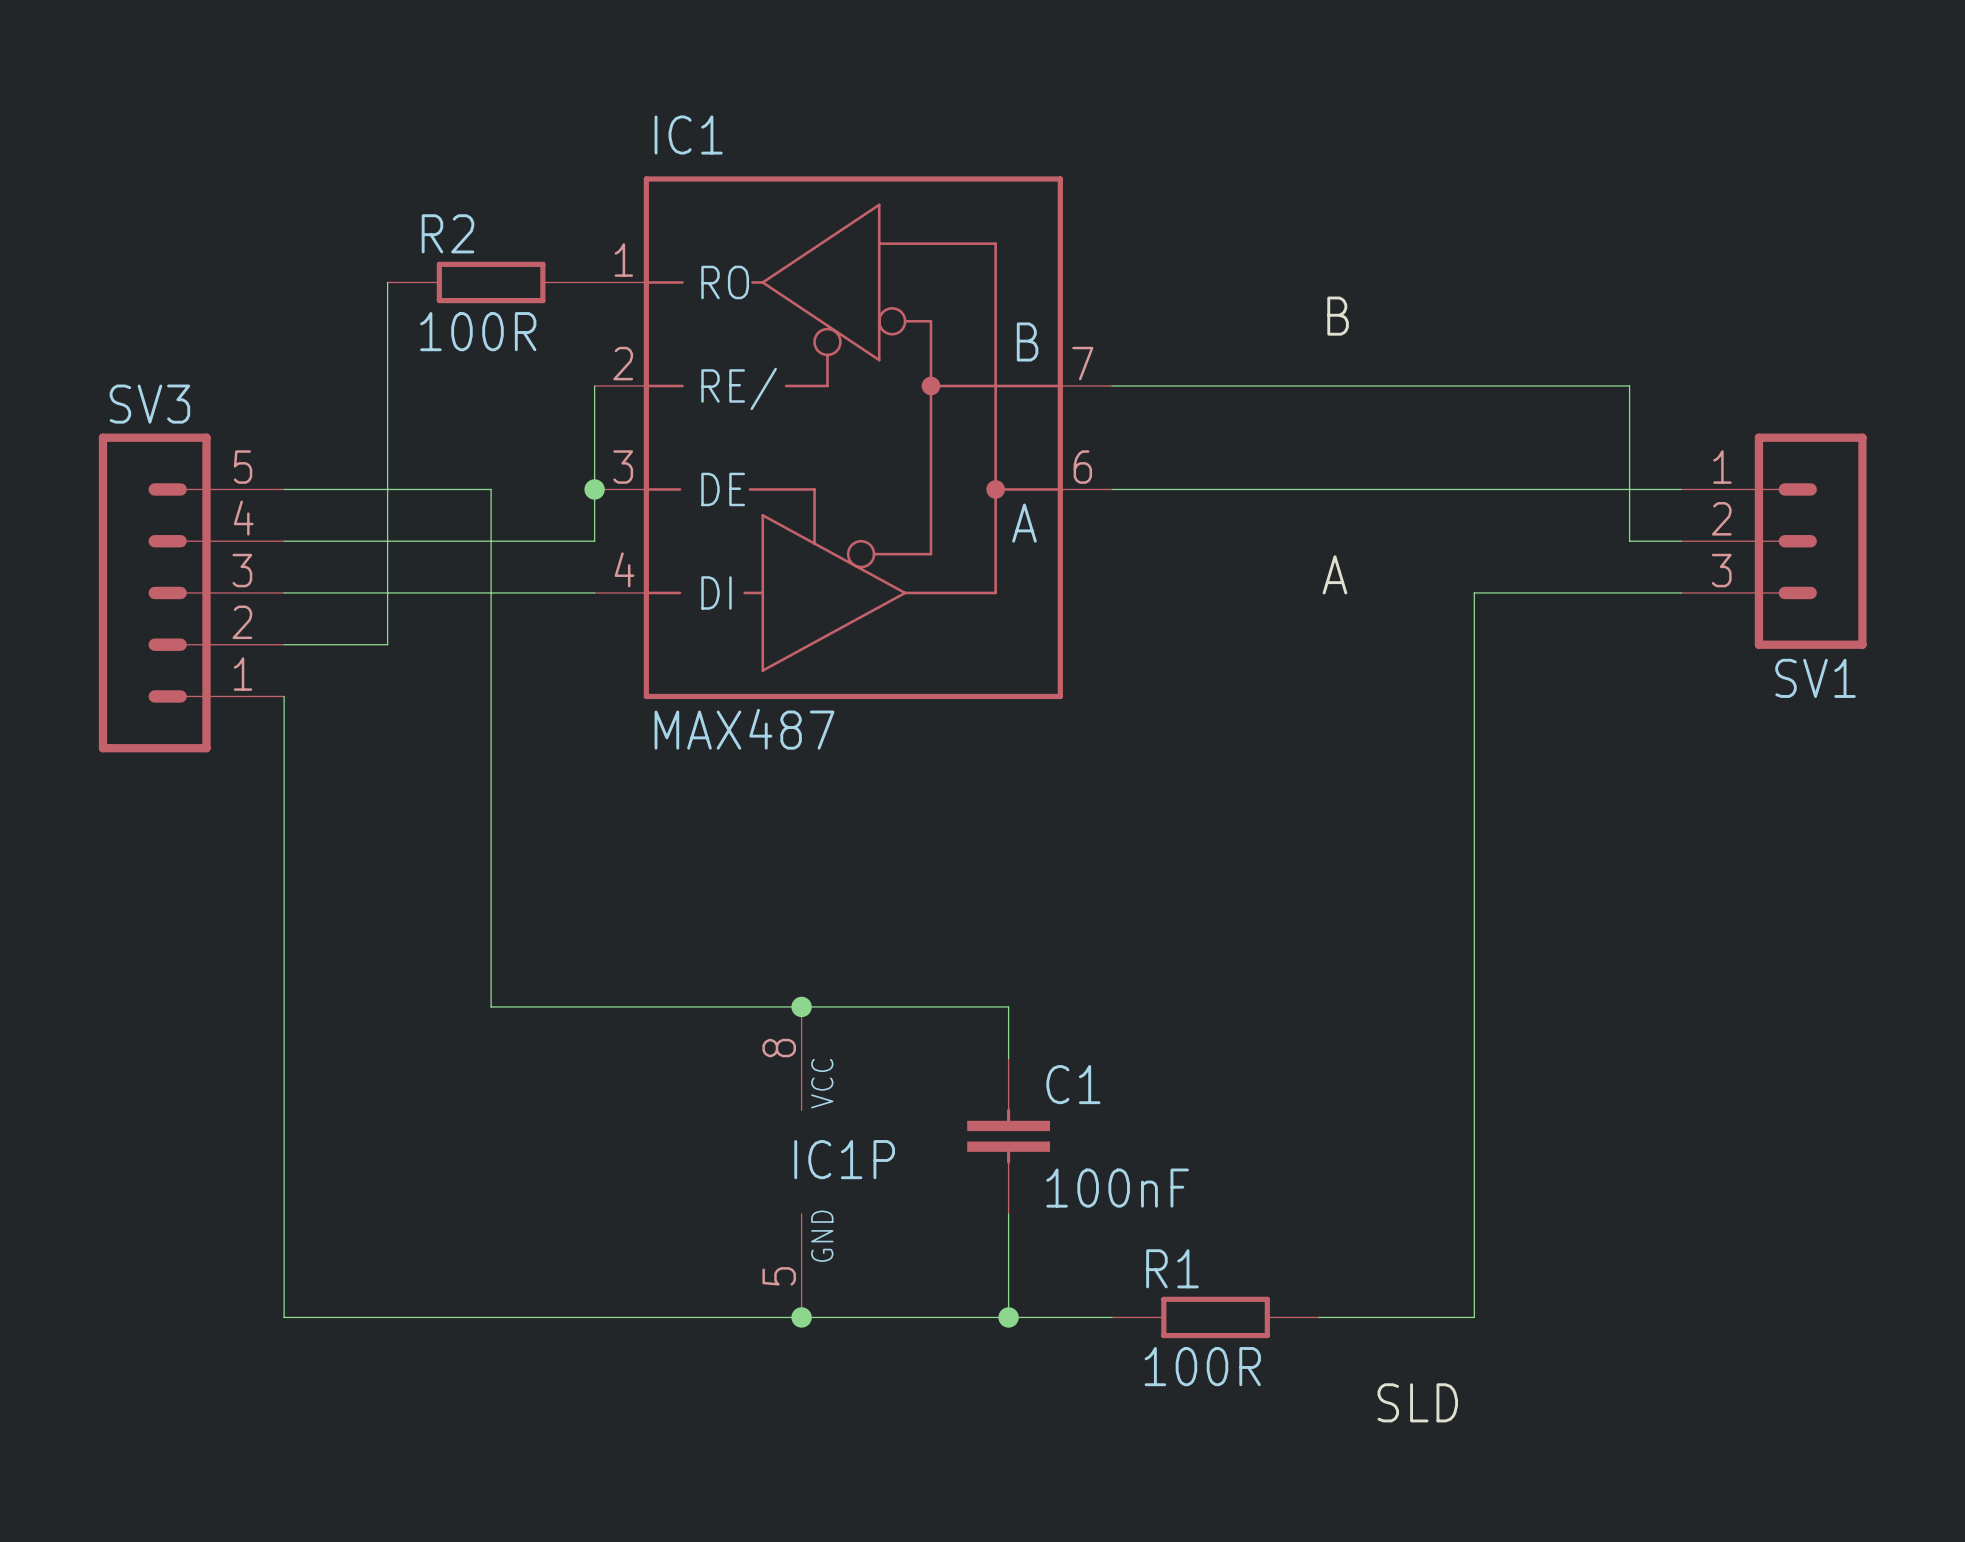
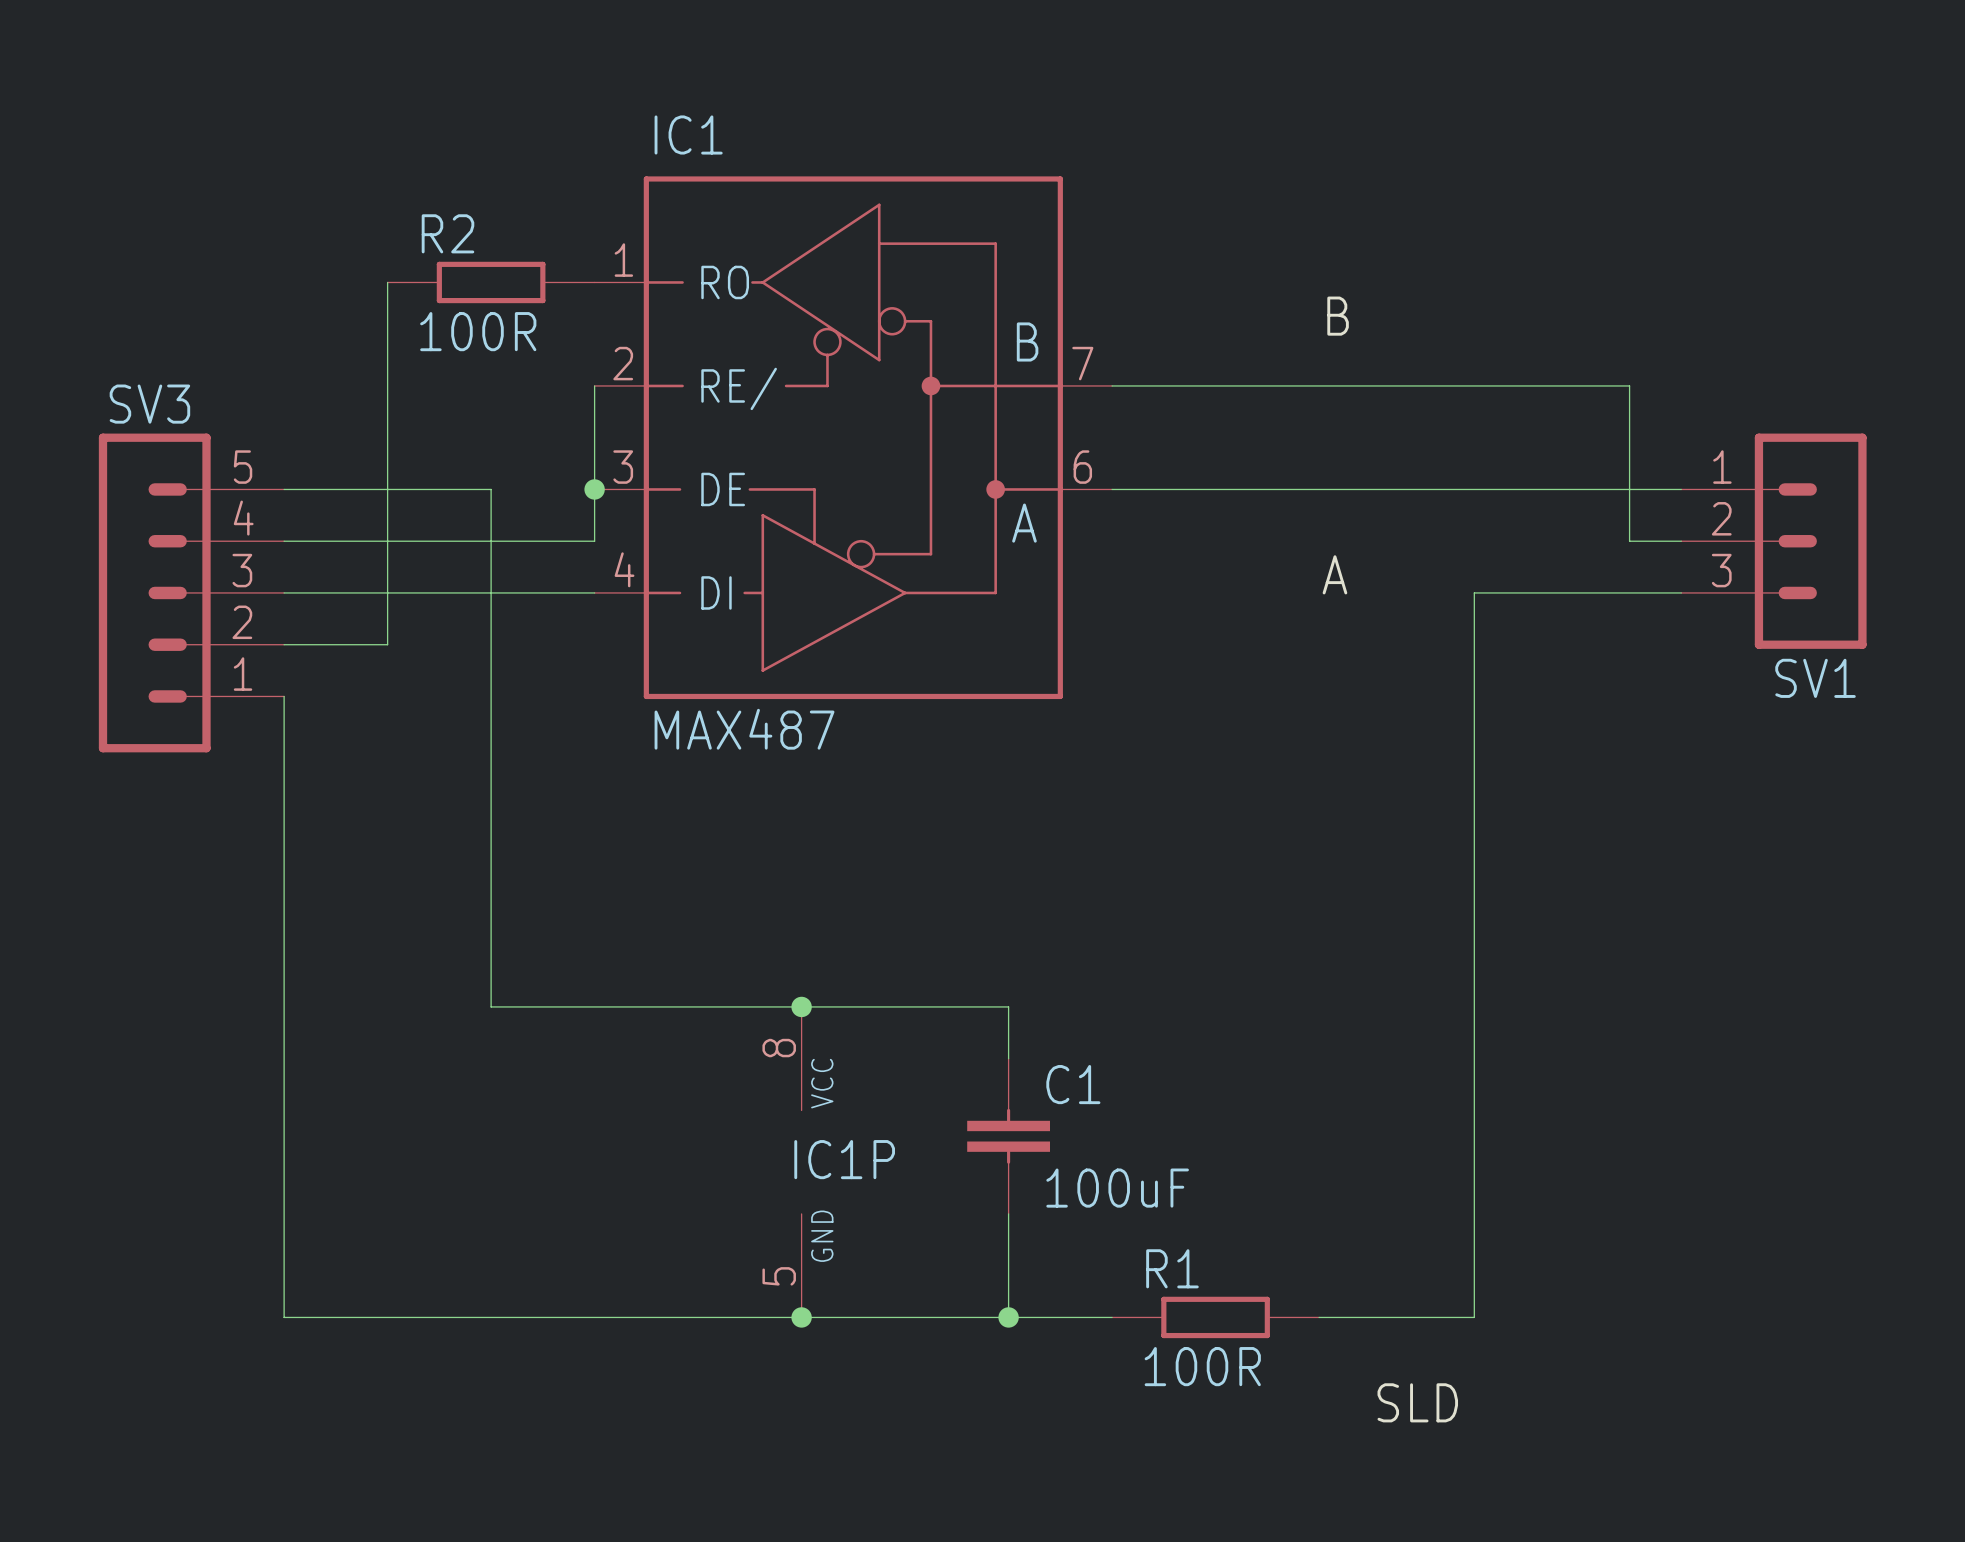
C1 value: 100nF (1117, 1188) -> 100uF (1117, 1188)

